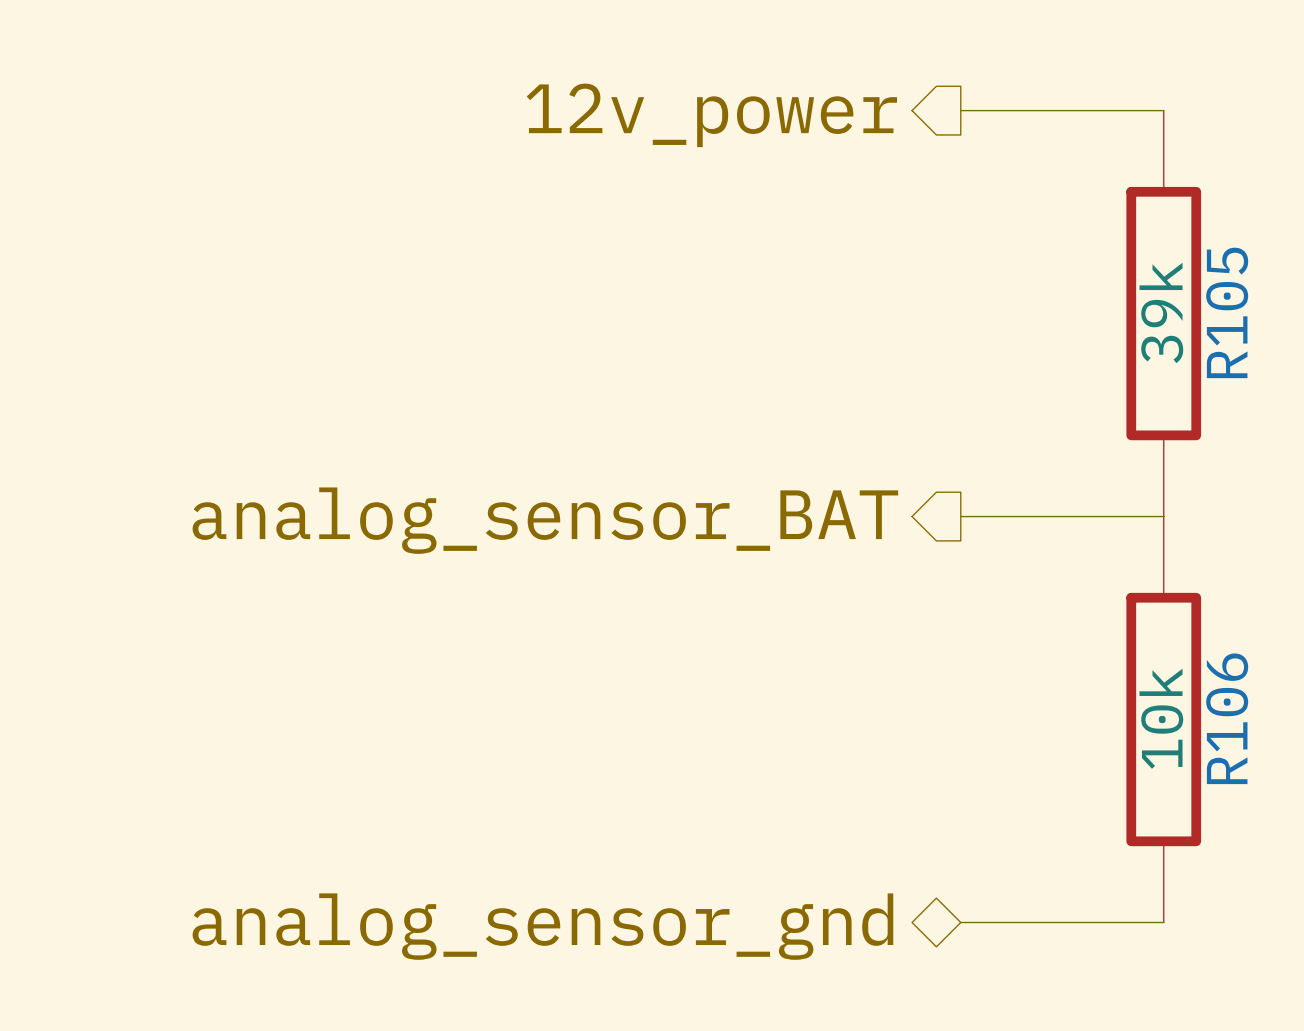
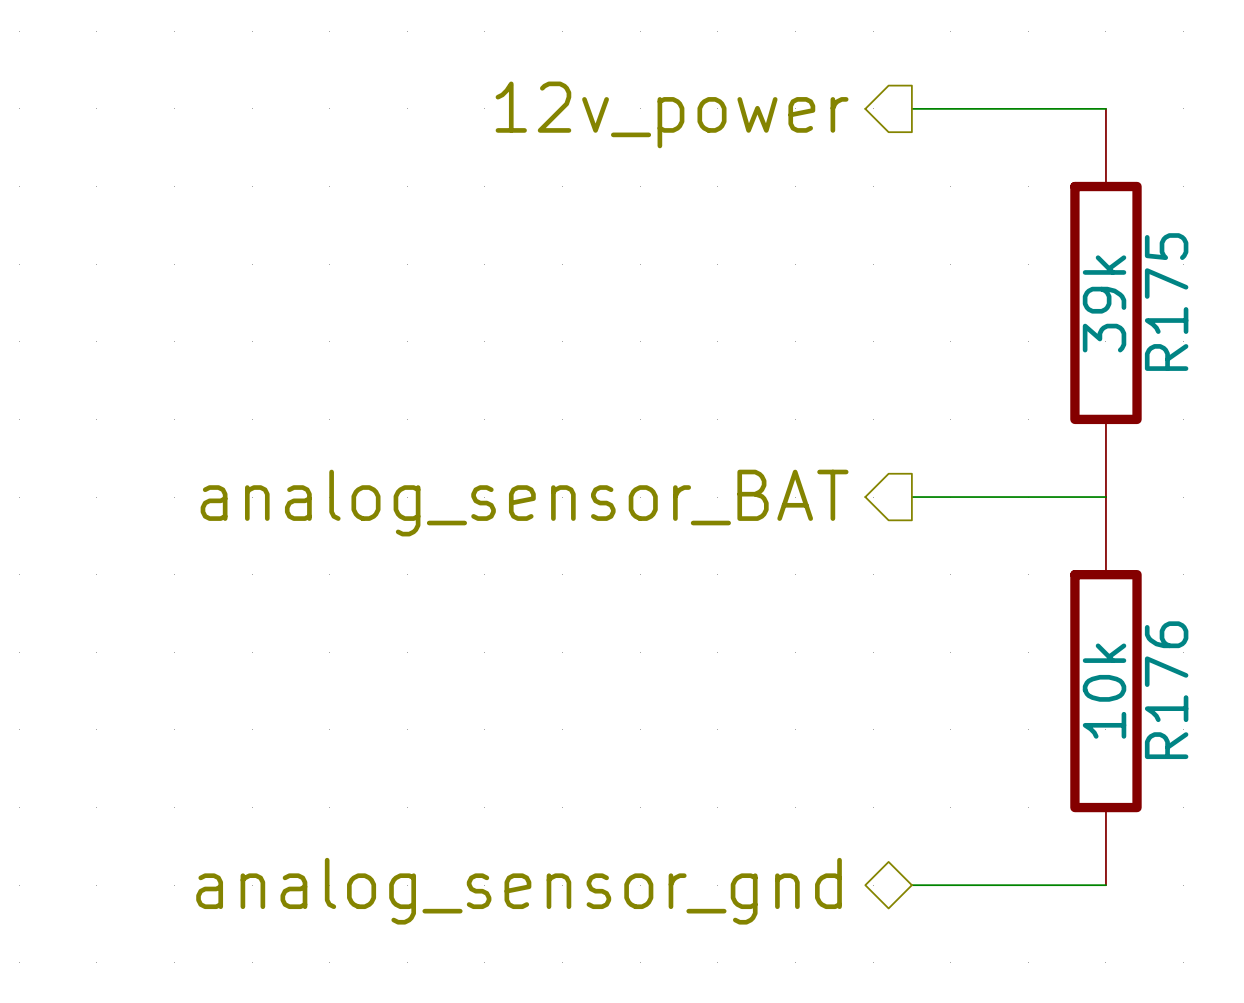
R105 name: R105 (1227, 312) -> R175 (1166, 302)
R106 name: R106 (1227, 718) -> R176 (1166, 690)

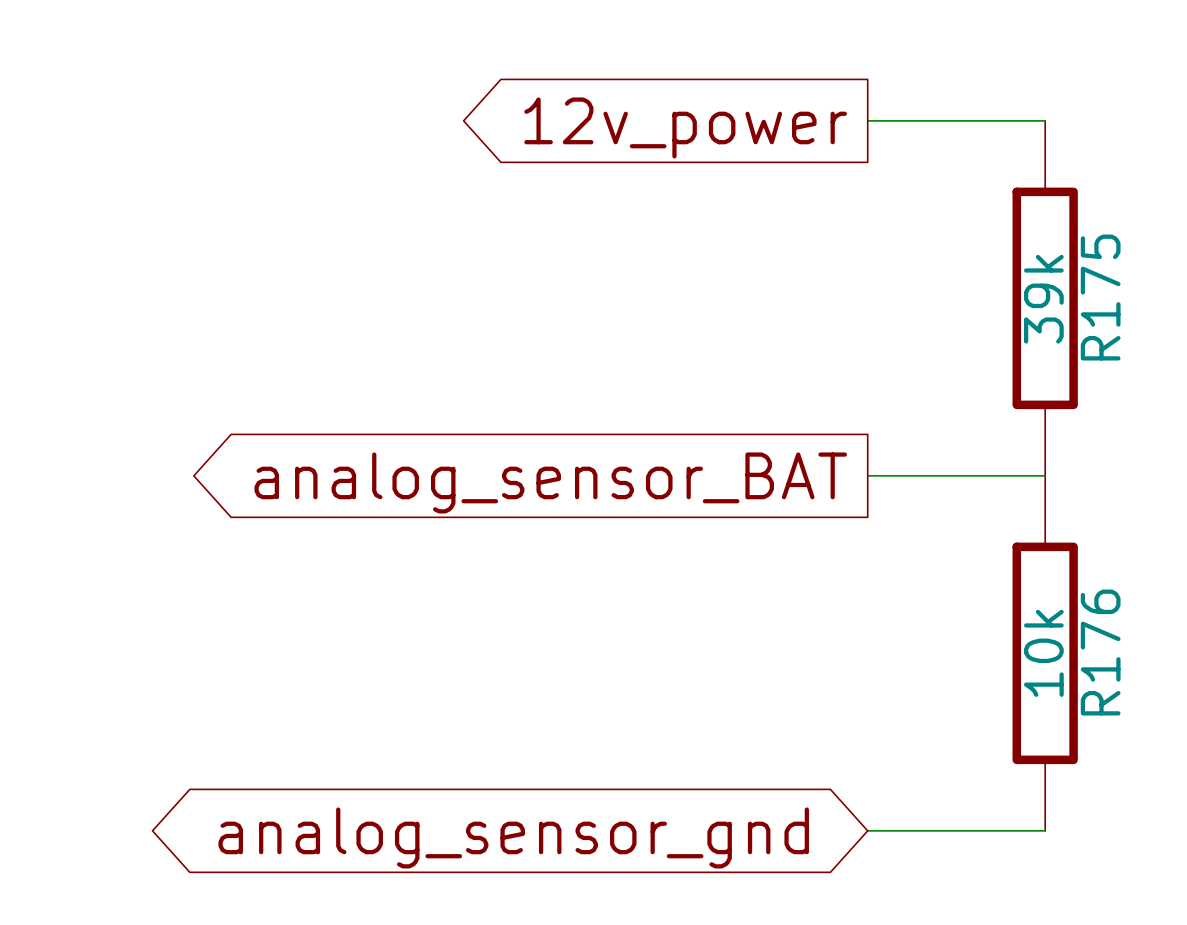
hierarchical label: 12v_power (672, 114) -> none
global label: none -> 12v_power (685, 127)
hierarchical label: analog_sensor_BAT (524, 503) -> none
global label: none -> analog_sensor_BAT (550, 482)
hierarchical label: analog_sensor_gnd (519, 891) -> none
global label: none -> analog_sensor_gnd (513, 837)

